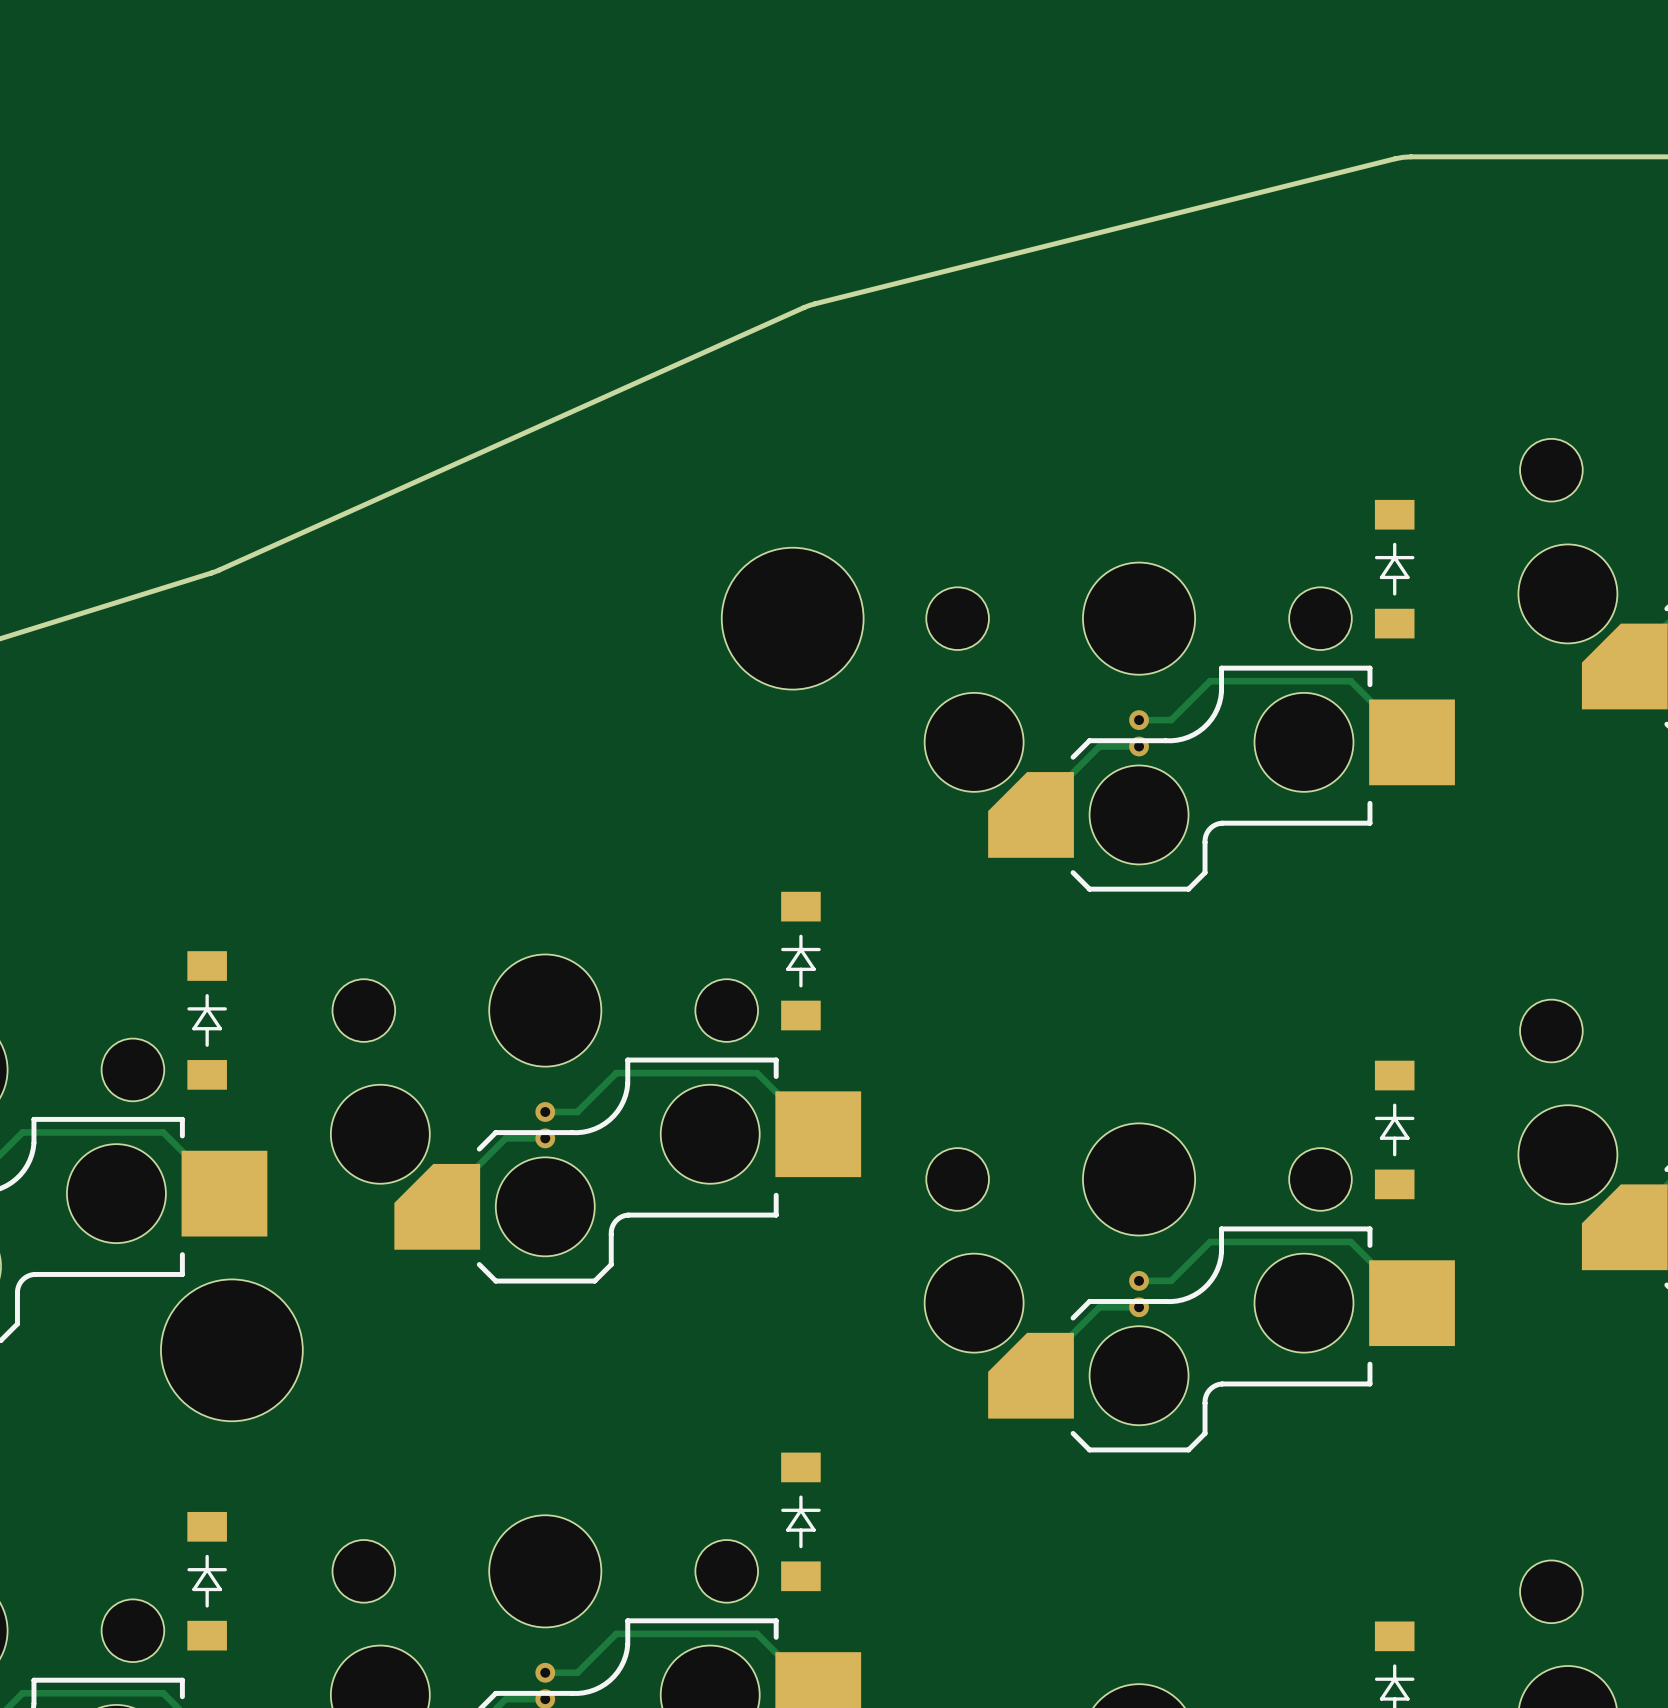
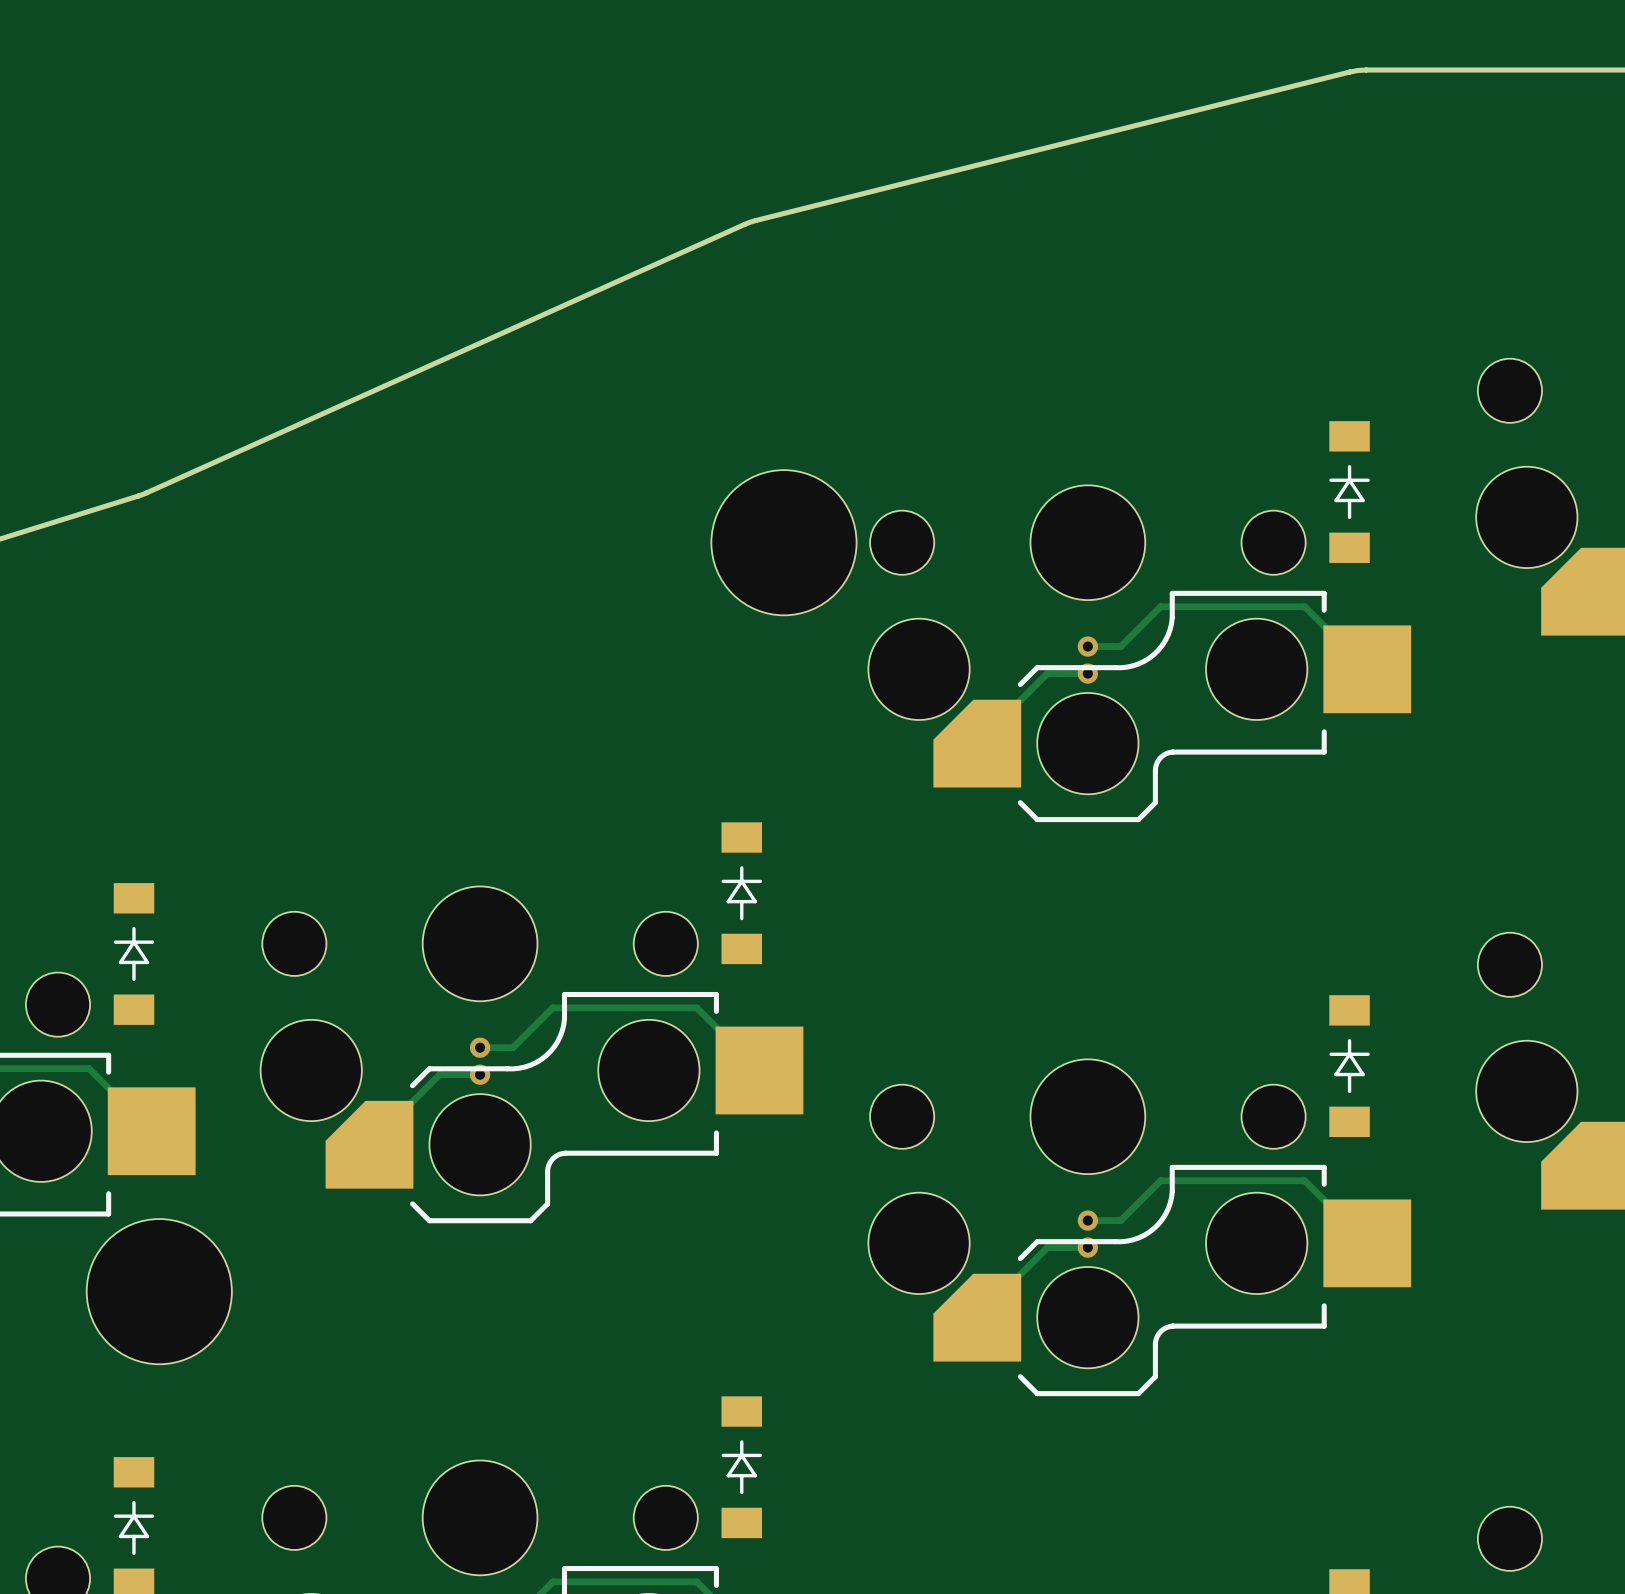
part position: (792, 618) -> (783, 542)

